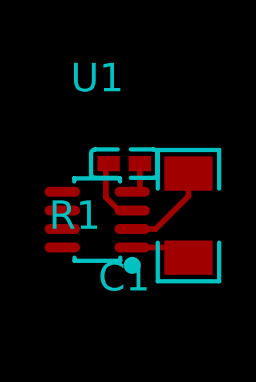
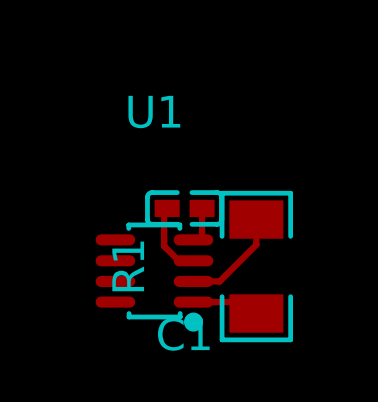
R1 name rotation: 0° (74, 214) -> 90° counterclockwise (128, 266)

